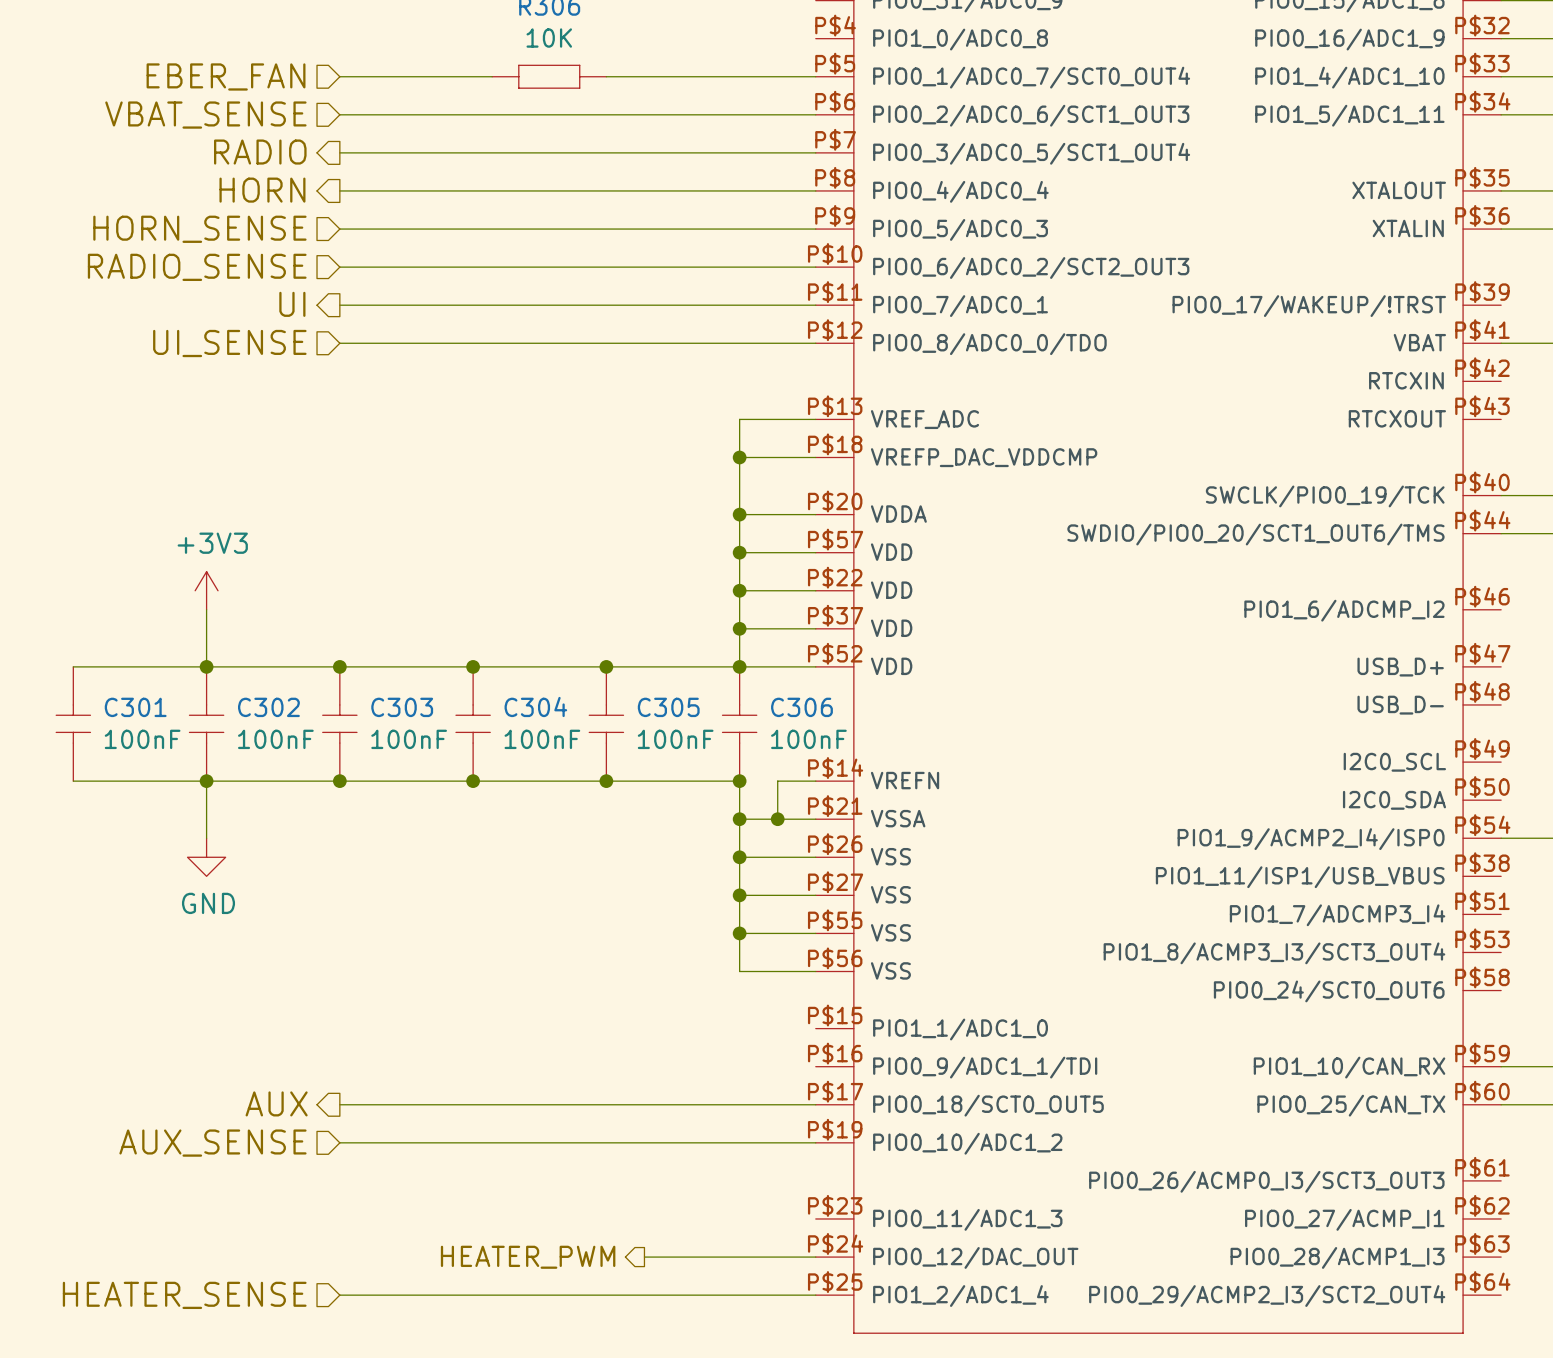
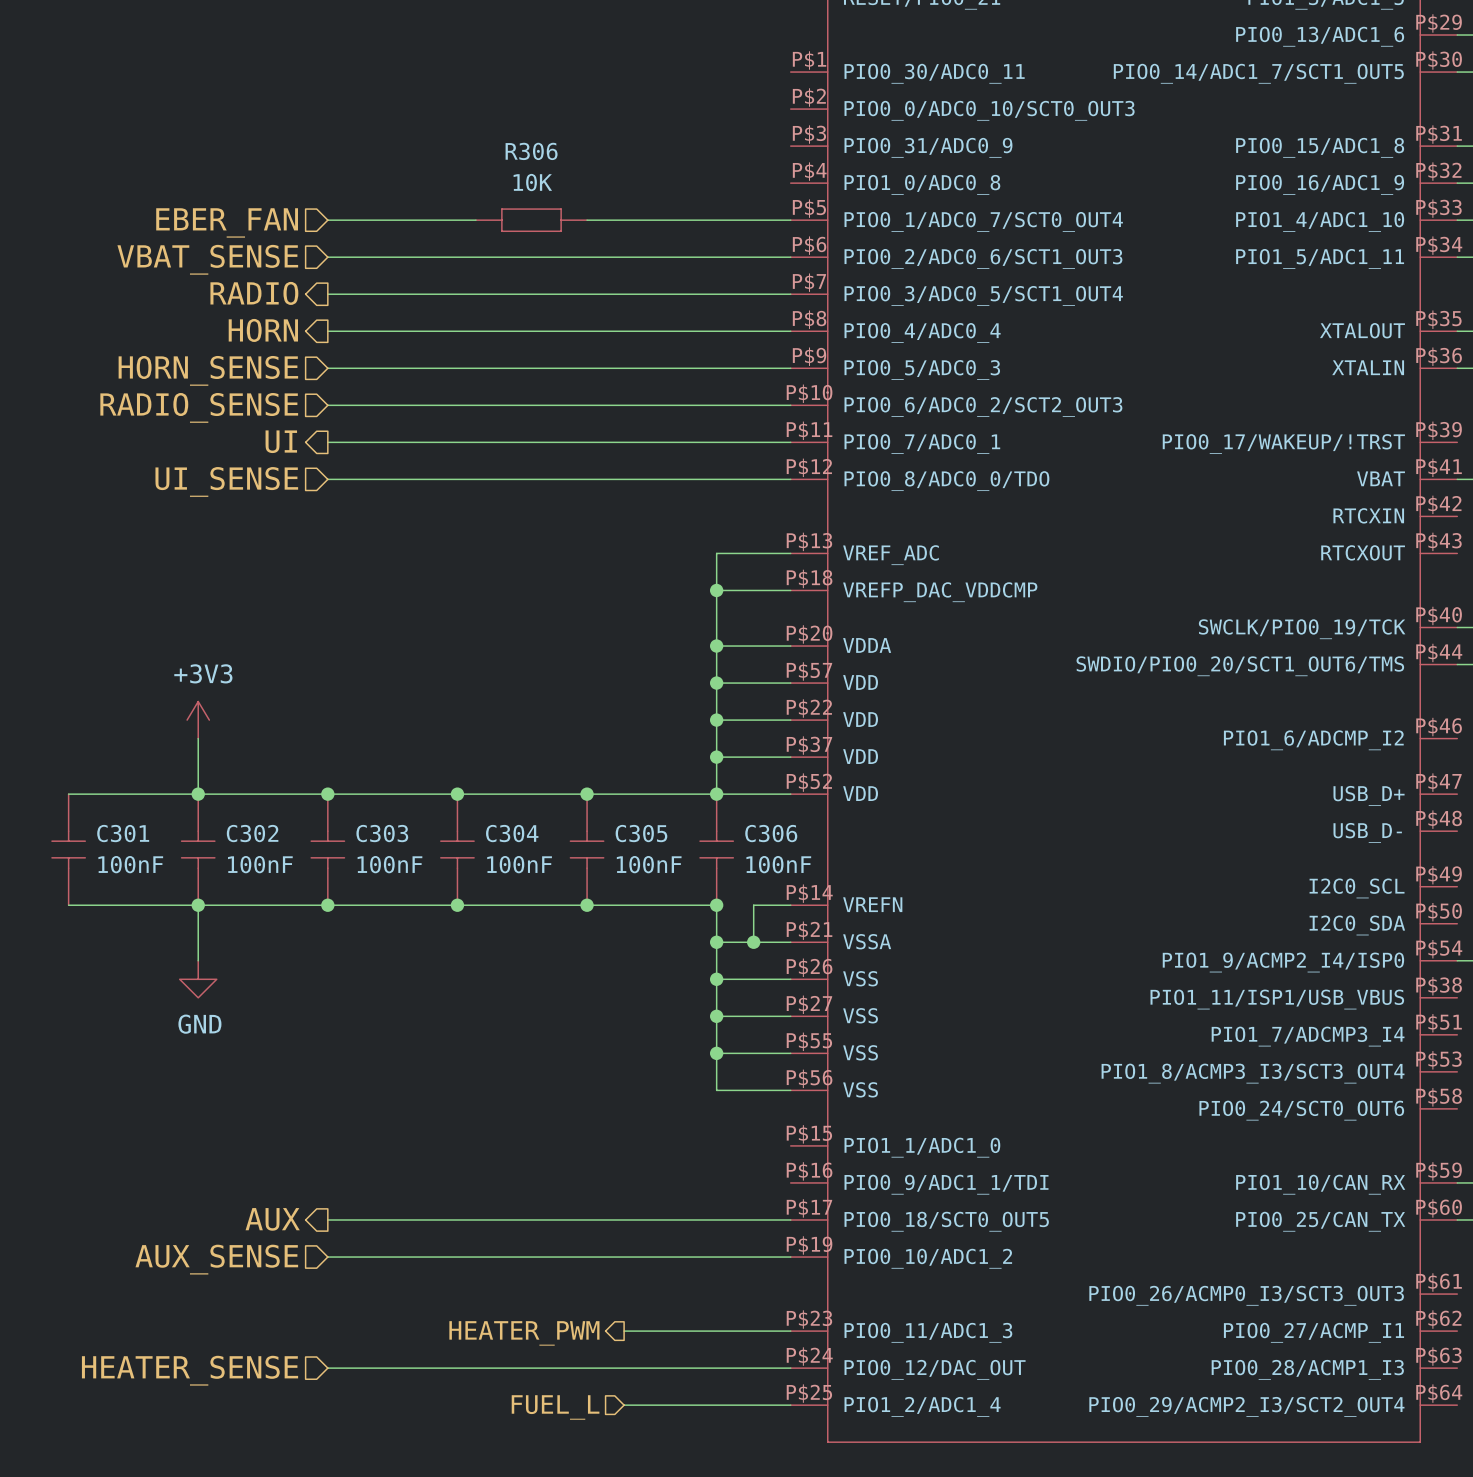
wire: none -> (624, 1331) (790, 1331)
hierarchical label position: HEATER_PWM (528, 1257) -> HEATER_PWM (524, 1333)
hierarchical label position: HEATER_SENSE (184, 1295) -> HEATER_SENSE (190, 1370)
wire: (339, 1295) (644, 1295) -> (327, 1368) (624, 1368)
hierarchical label: none -> FUEL_L (555, 1407)

